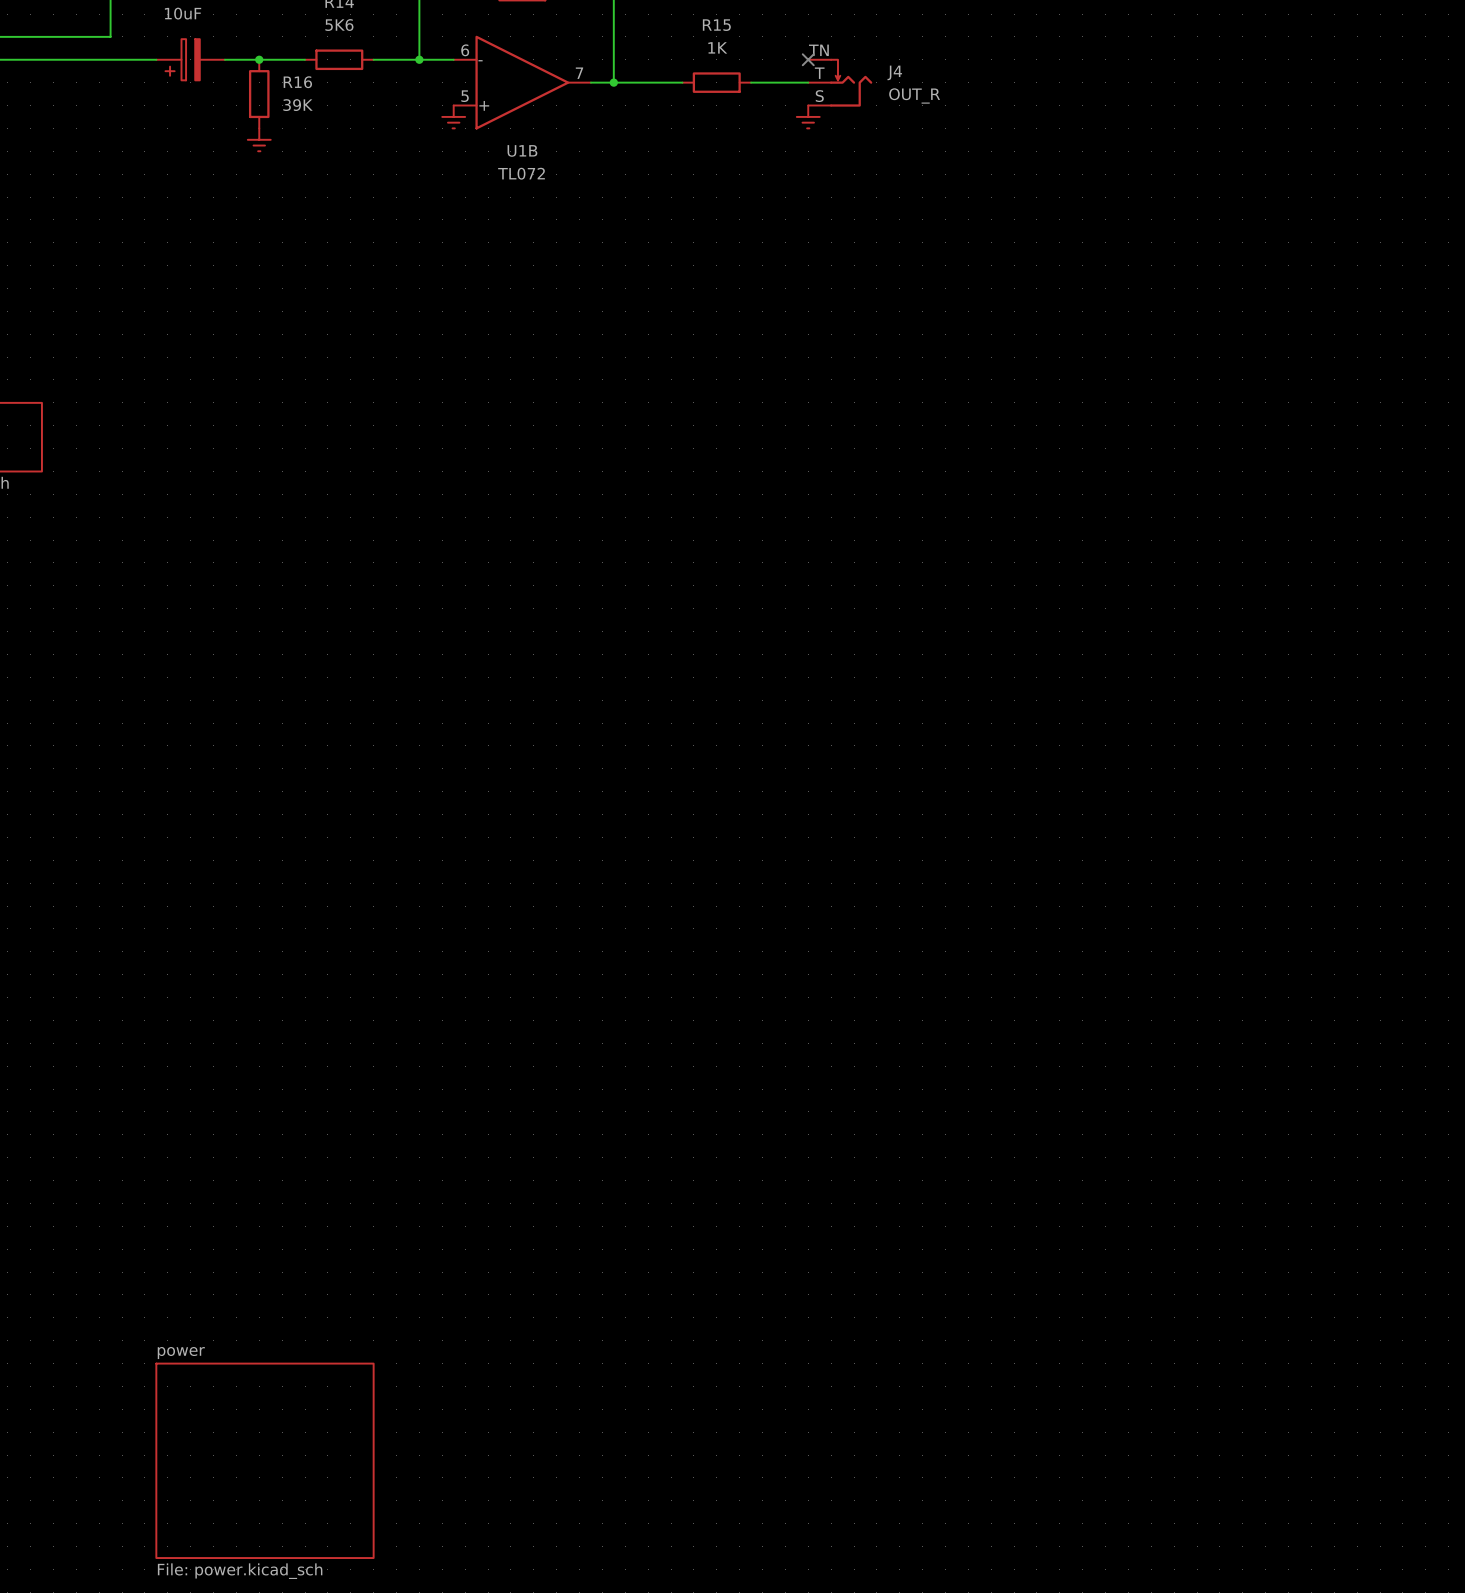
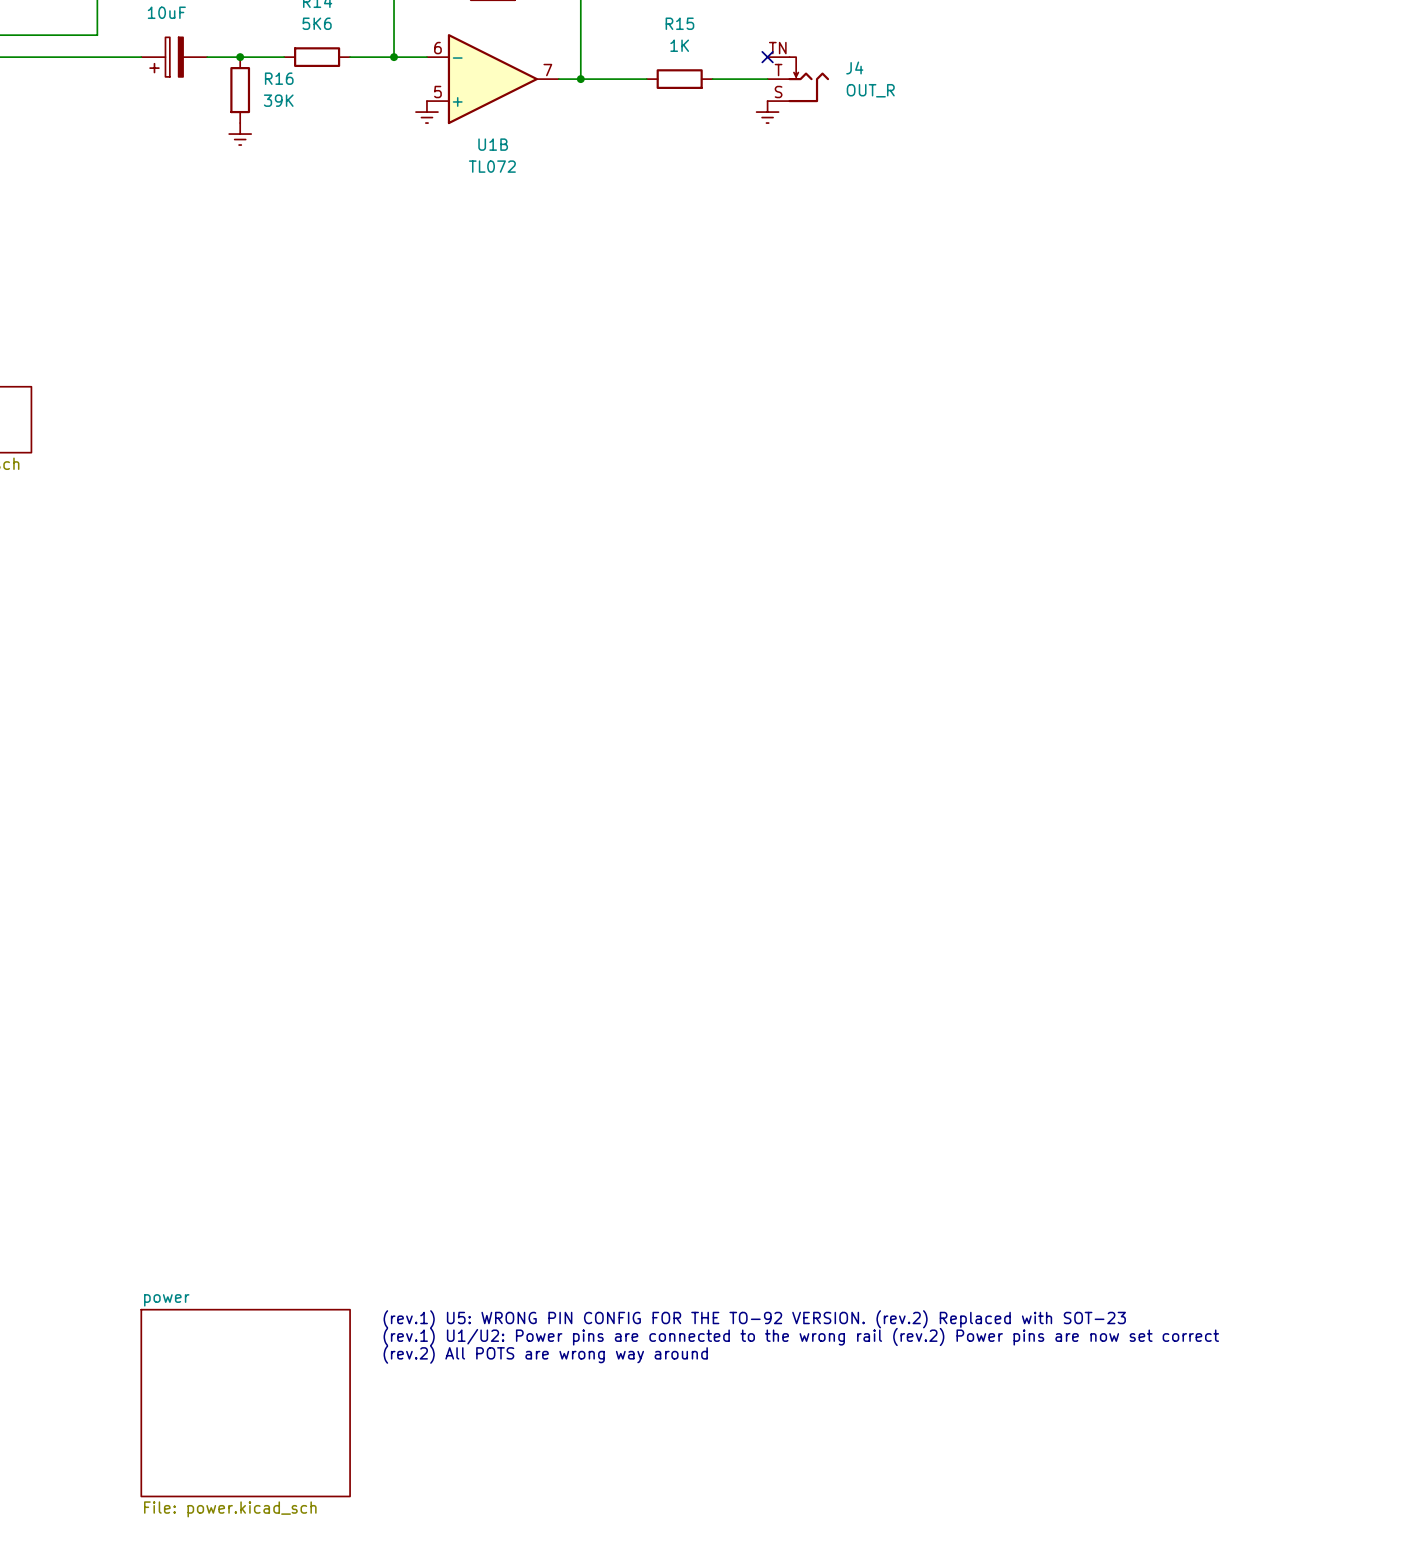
text: none -> (rev.1) U5: WRONG PIN CONFIG FOR THE TO-92 VERSION. (rev.2) Replaced with SOT-23 (754, 1319)
text: none -> (rev.1) U1/U2: Power pins are connected to the wrong rail (rev.2) Power pins are now set correct (801, 1336)
text: none -> (rev.2) All POTS are wrong way around (545, 1354)

